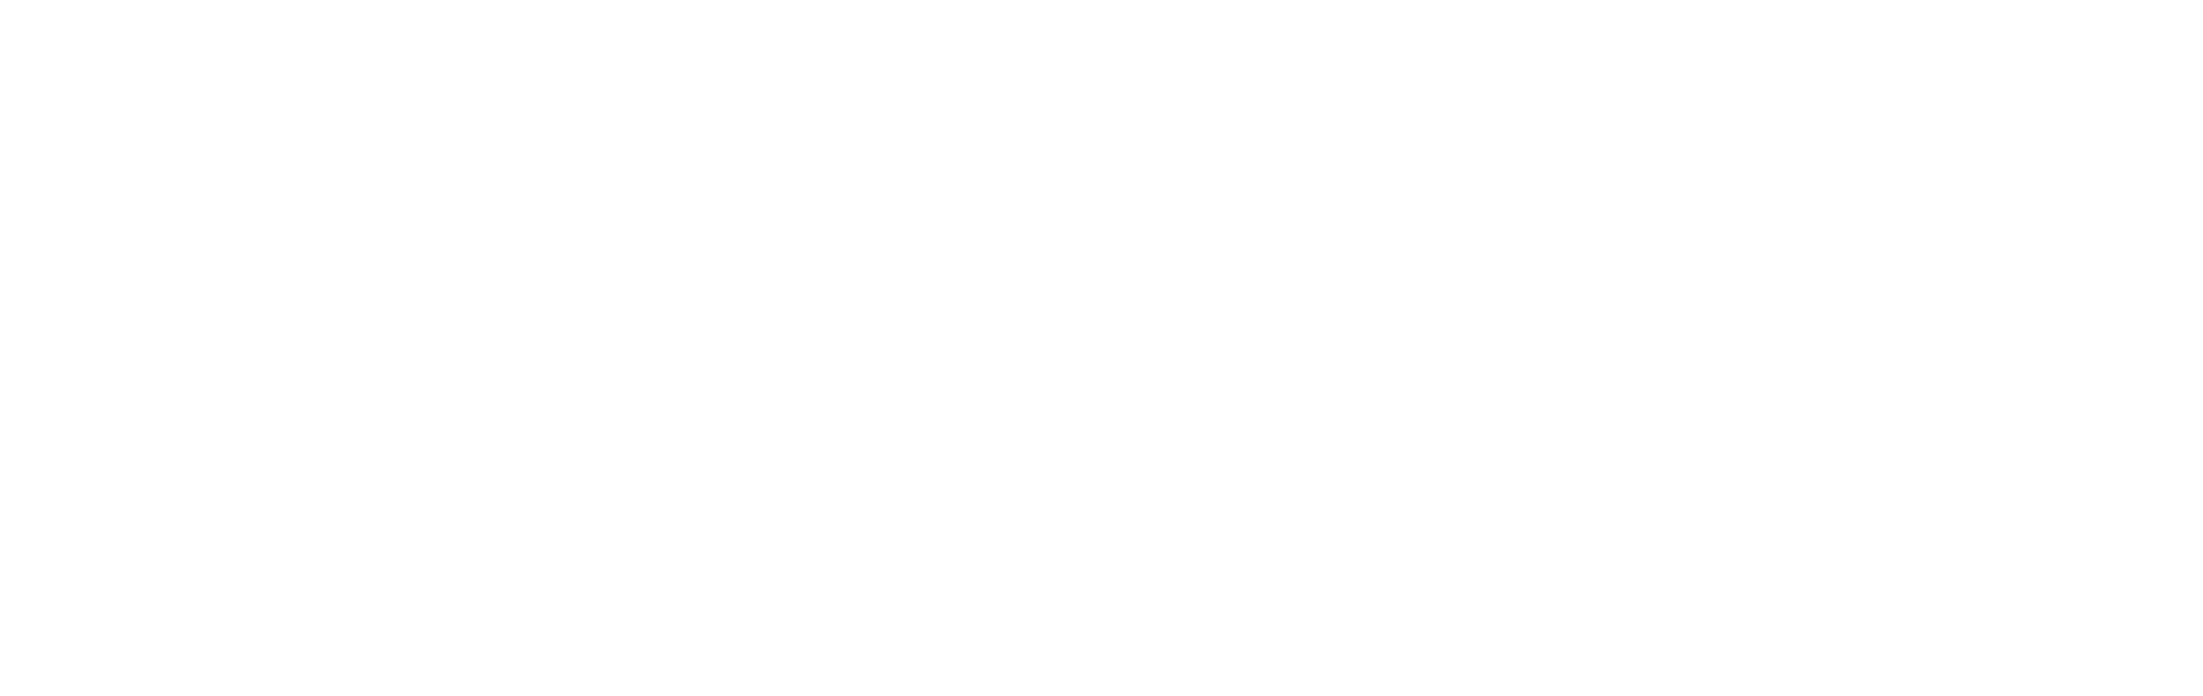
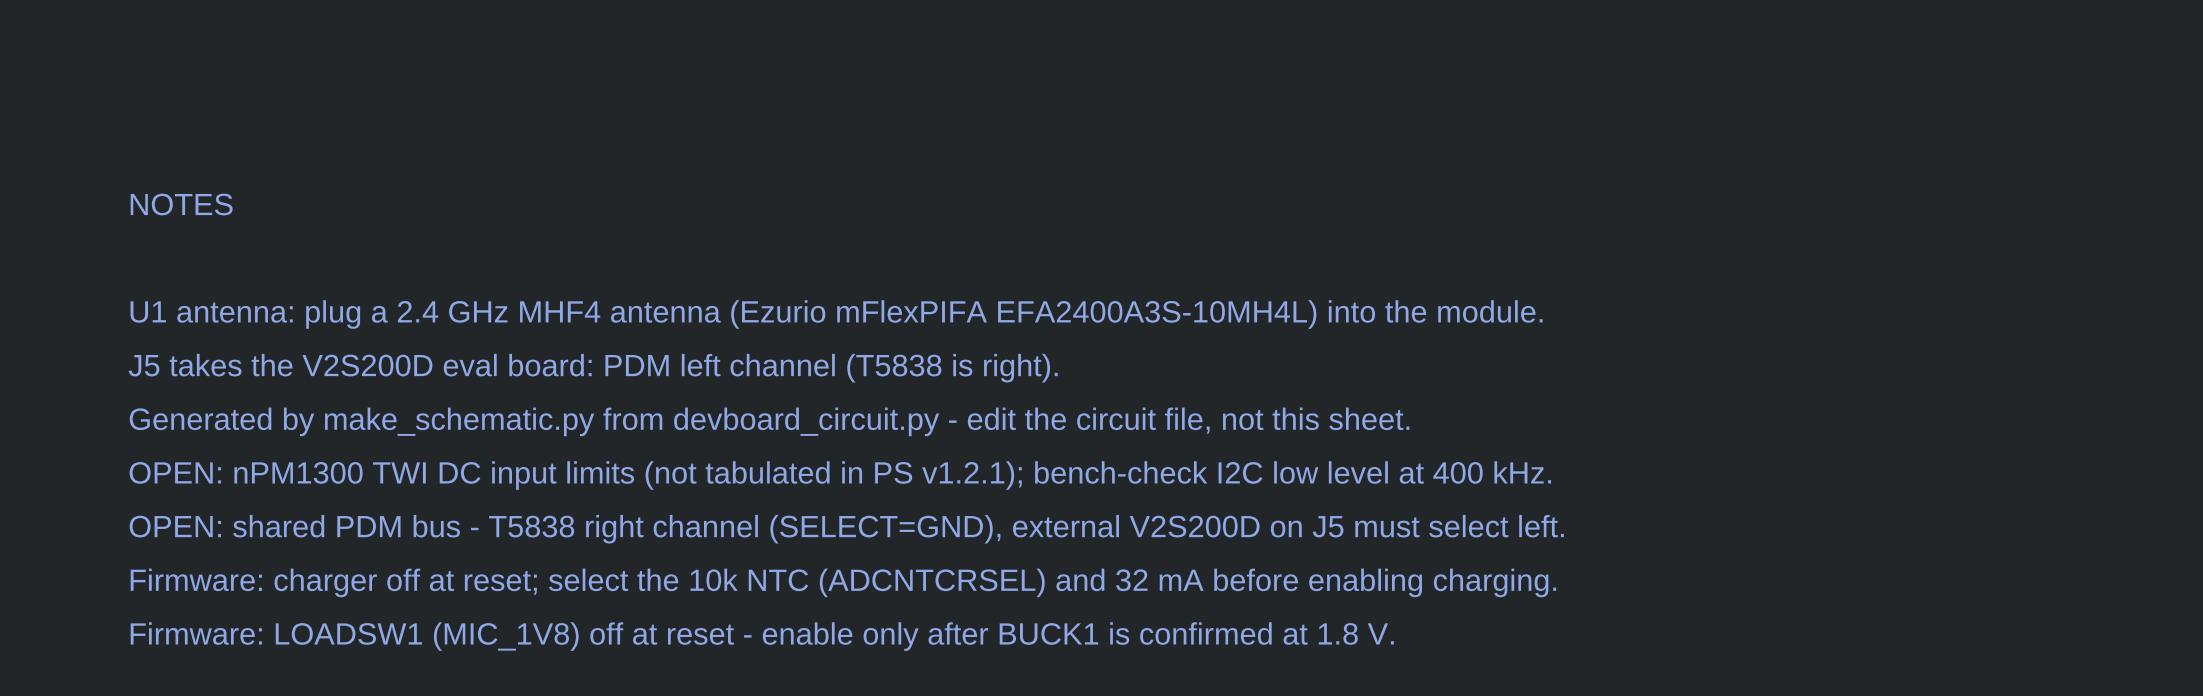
text: none -> NOTES (181, 204)
text: none -> U1 antenna: plug a 2.4 GHz MHF4 antenna (Ezurio mFlexPIFA EFA2400A3S-10MH4L) into the module. (836, 314)
text: none -> J5 takes the V2S200D eval board: PDM left channel (T5838 is right). (593, 368)
text: none -> Generated by make_schematic.py from devboard_circuit.py - edit the circuit file, not this sheet. (769, 421)
text: none -> OPEN: nPM1300 TWI DC input limits (not tabulated in PS v1.2.1); bench-check I2C low level at 400 kHz. (840, 475)
text: none -> OPEN: shared PDM bus - T5838 right channel (SELECT=GND), external V2S200D on J5 must select left. (846, 529)
text: none -> Firmware: charger off at reset; select the 10k NTC (ADCNTCRSEL) and 32 mA before enabling charging. (843, 582)
text: none -> Firmware: LOADSW1 (MIC_1V8) off at reset - enable only after BUCK1 is confirmed at 1.8 V. (762, 636)

